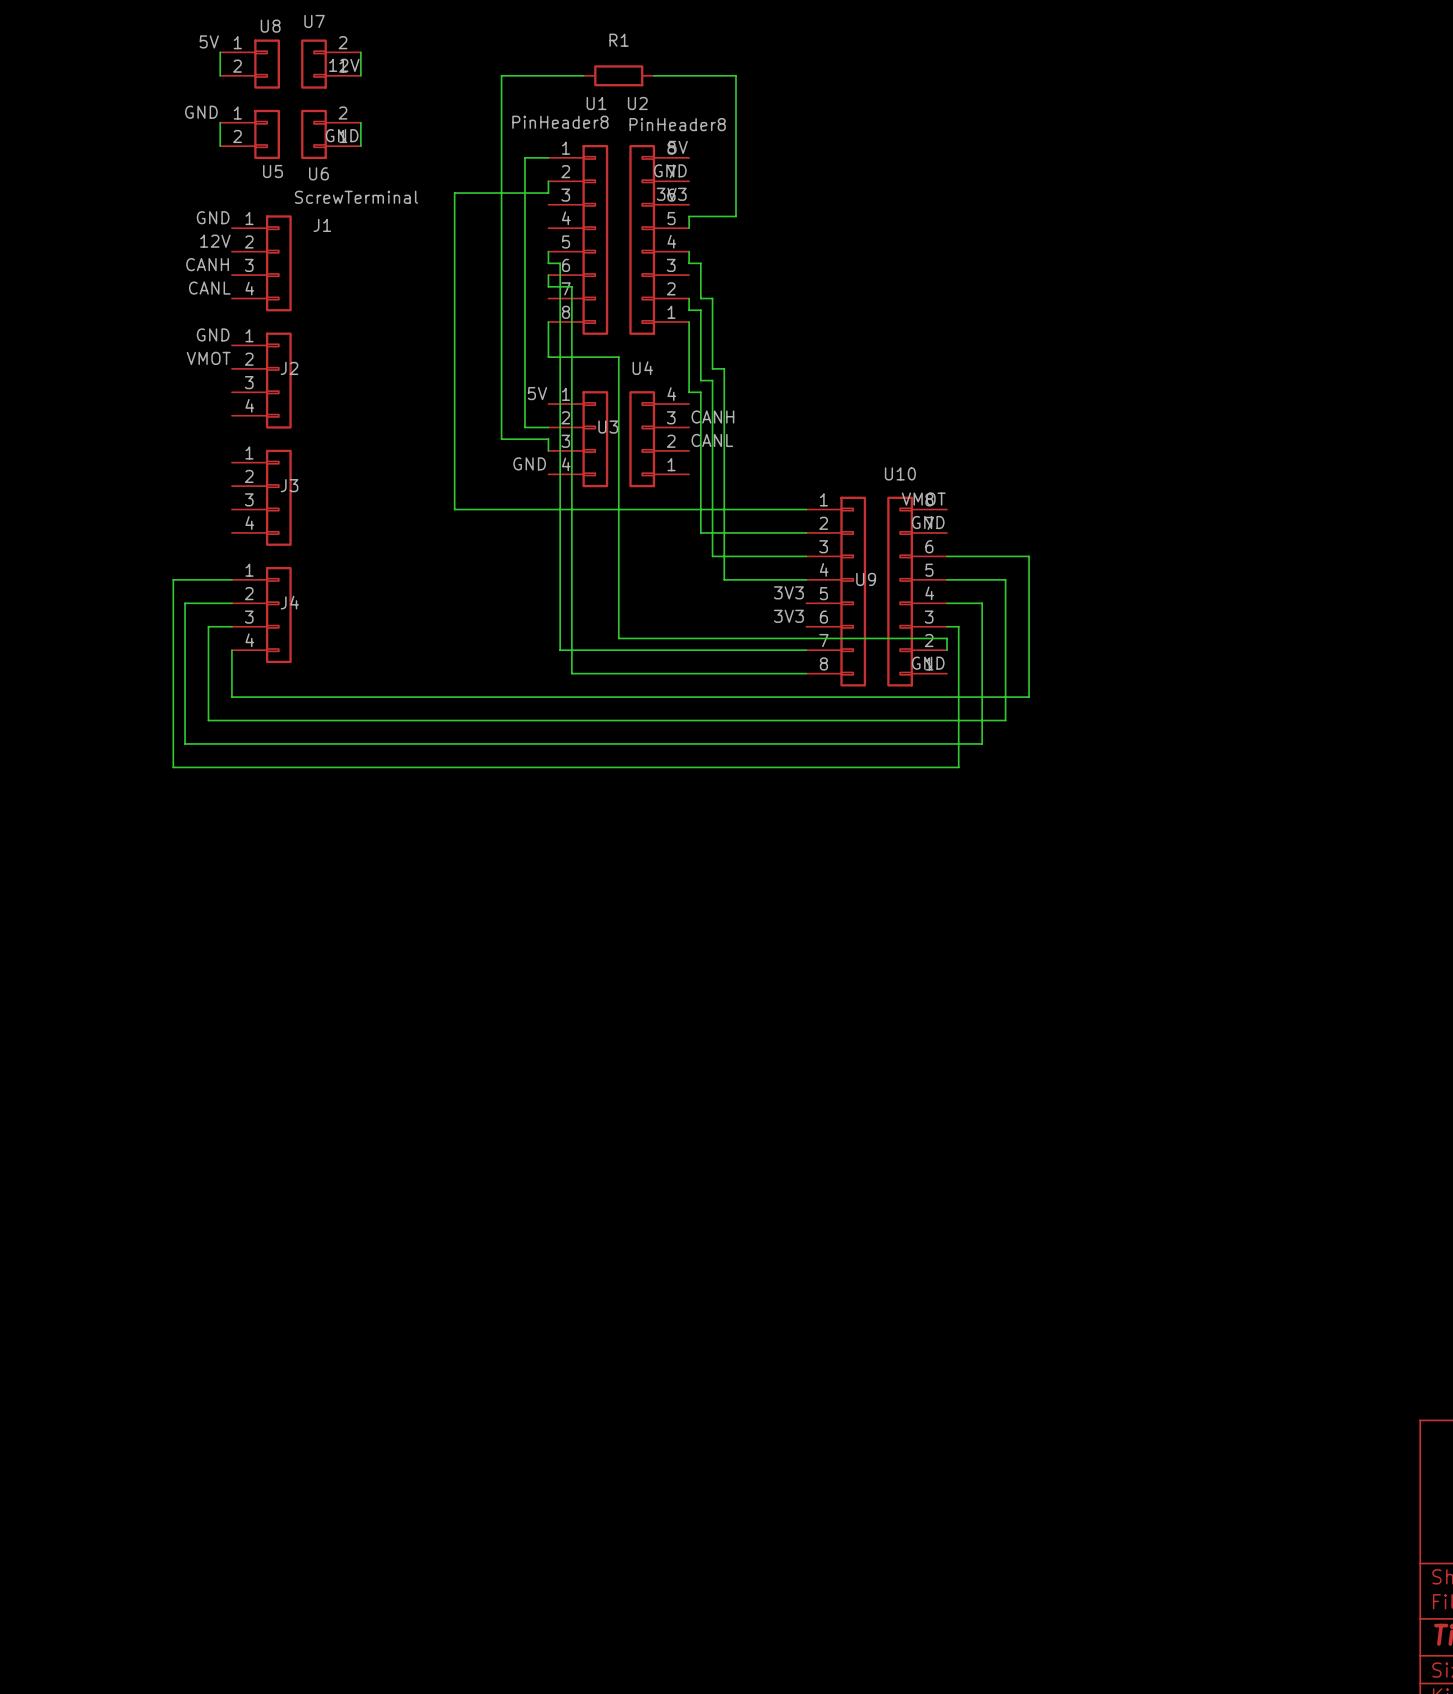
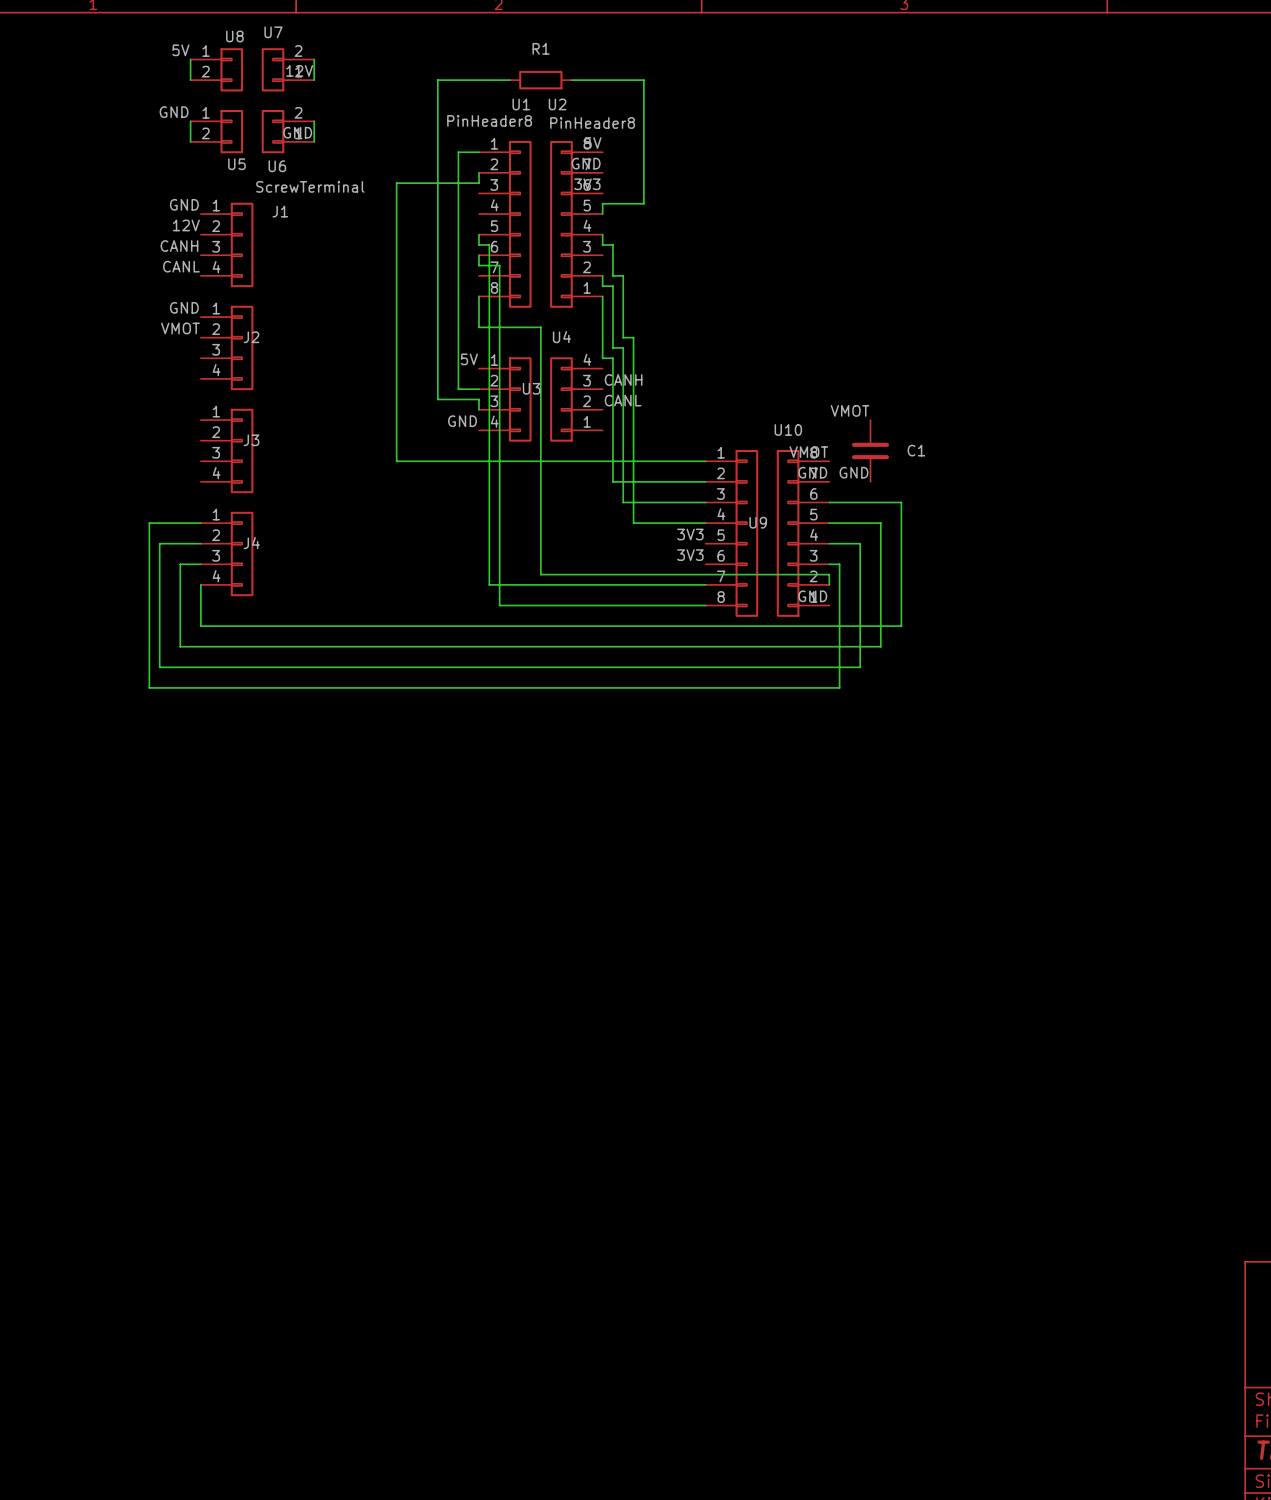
label: none -> VMOT (850, 410)
C1: none -> (870, 450)
label: none -> GND (853, 472)

